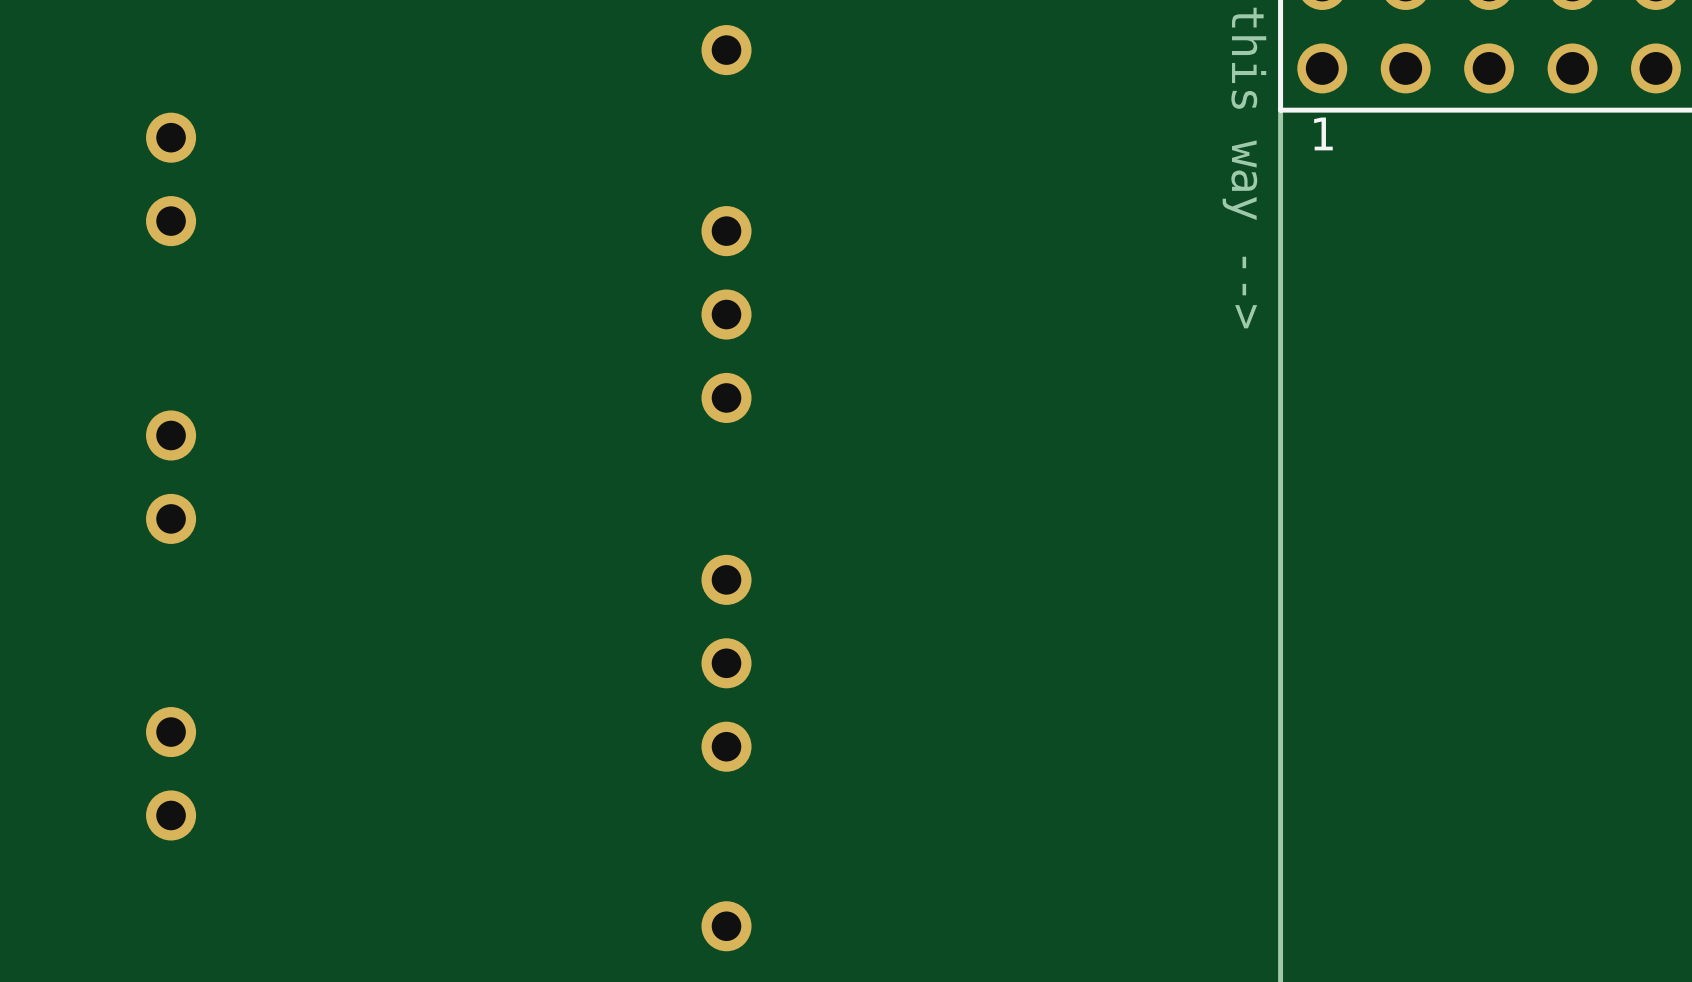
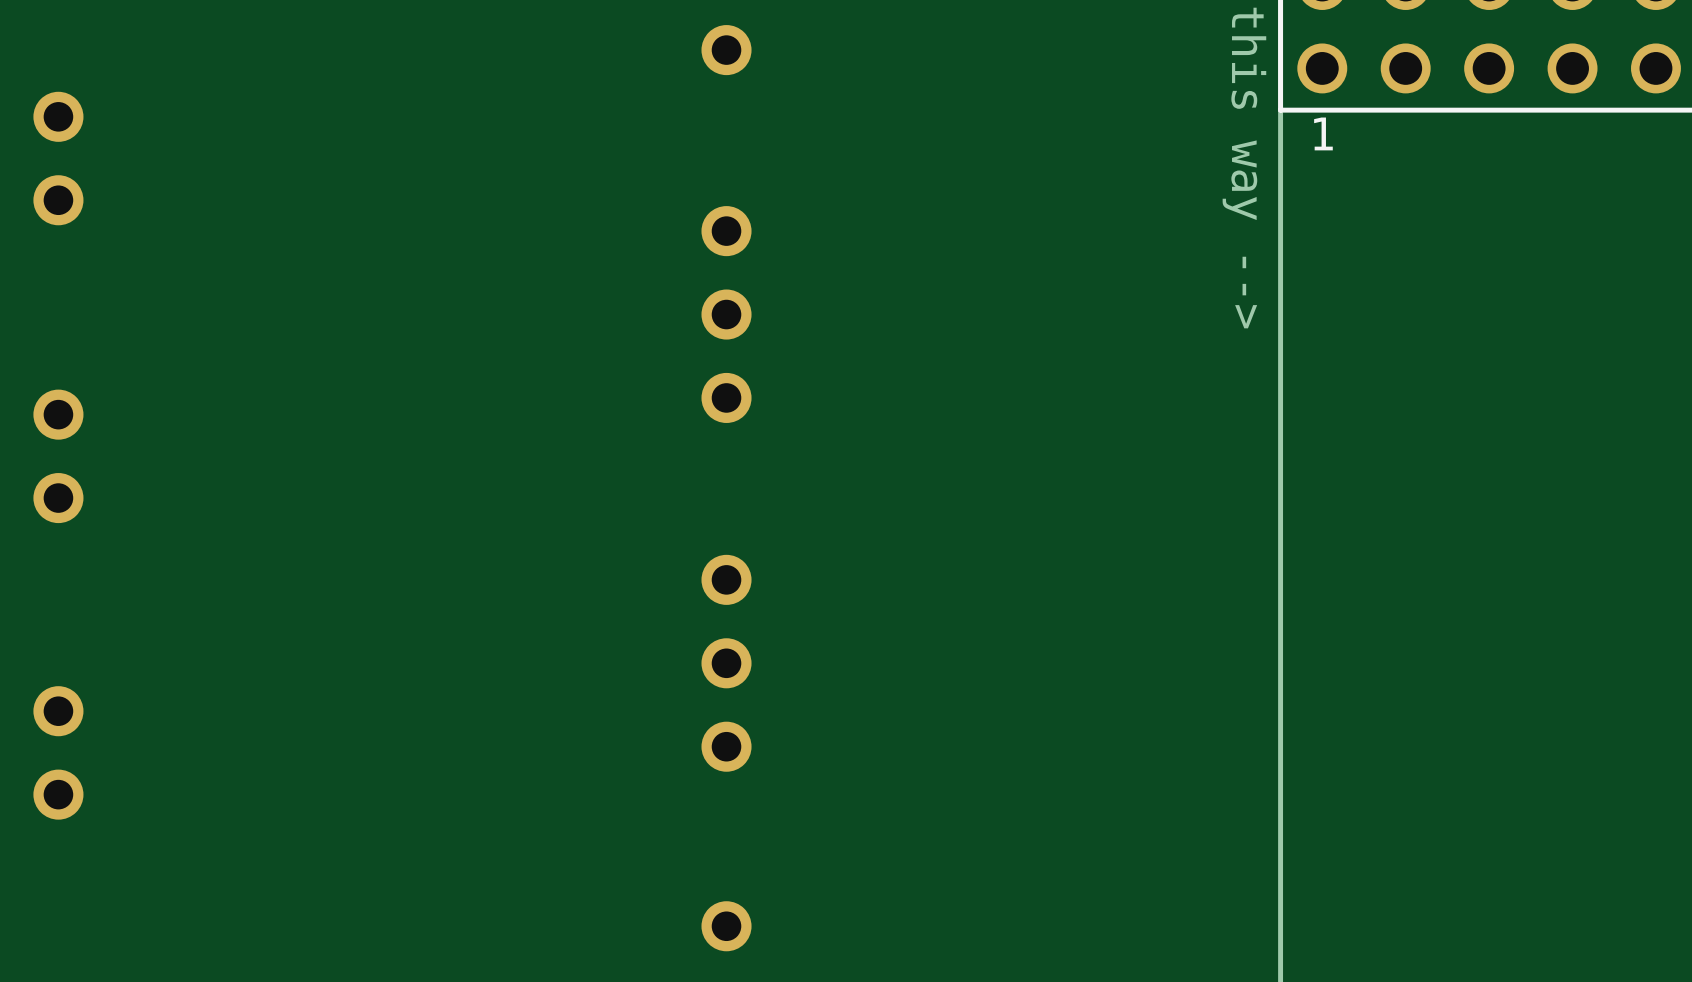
part position: (171, 179) -> (58, 158)
part position: (171, 477) -> (58, 456)
part position: (171, 773) -> (58, 752)

